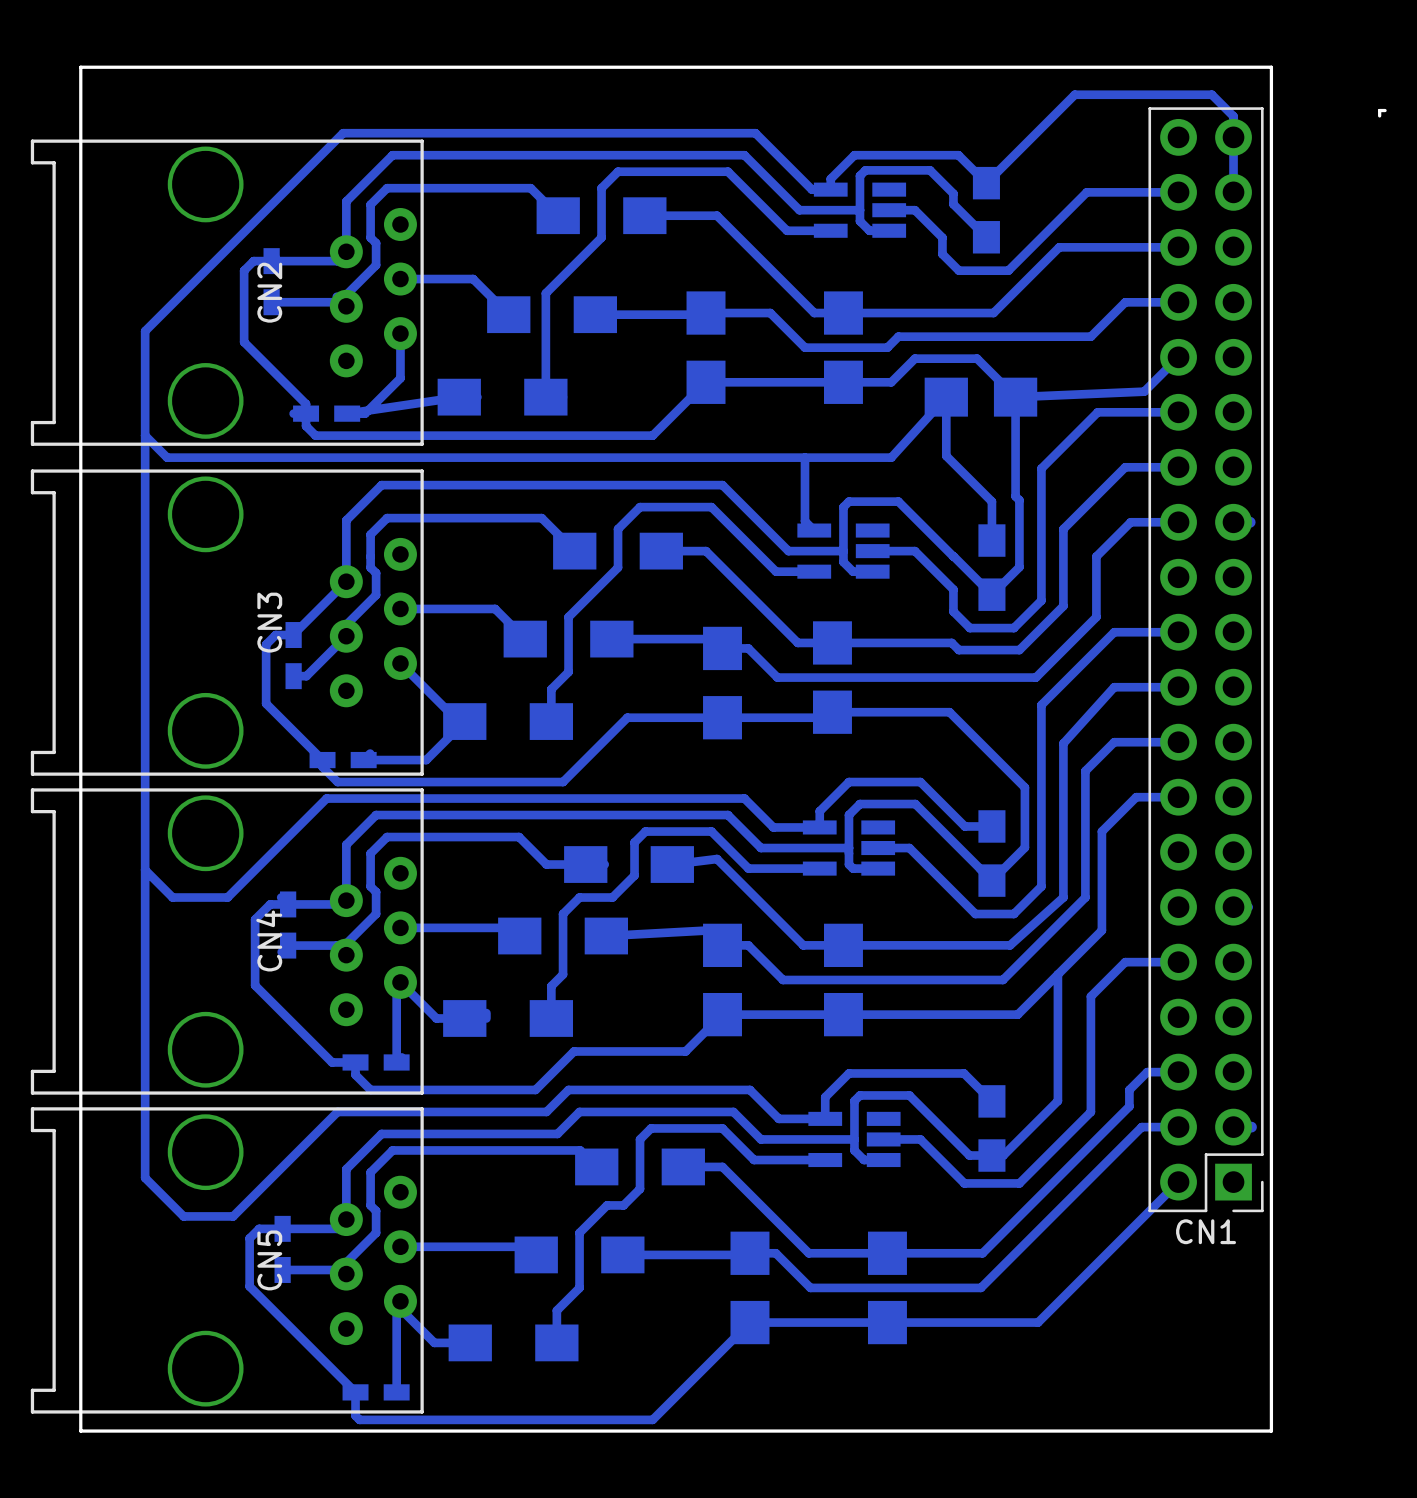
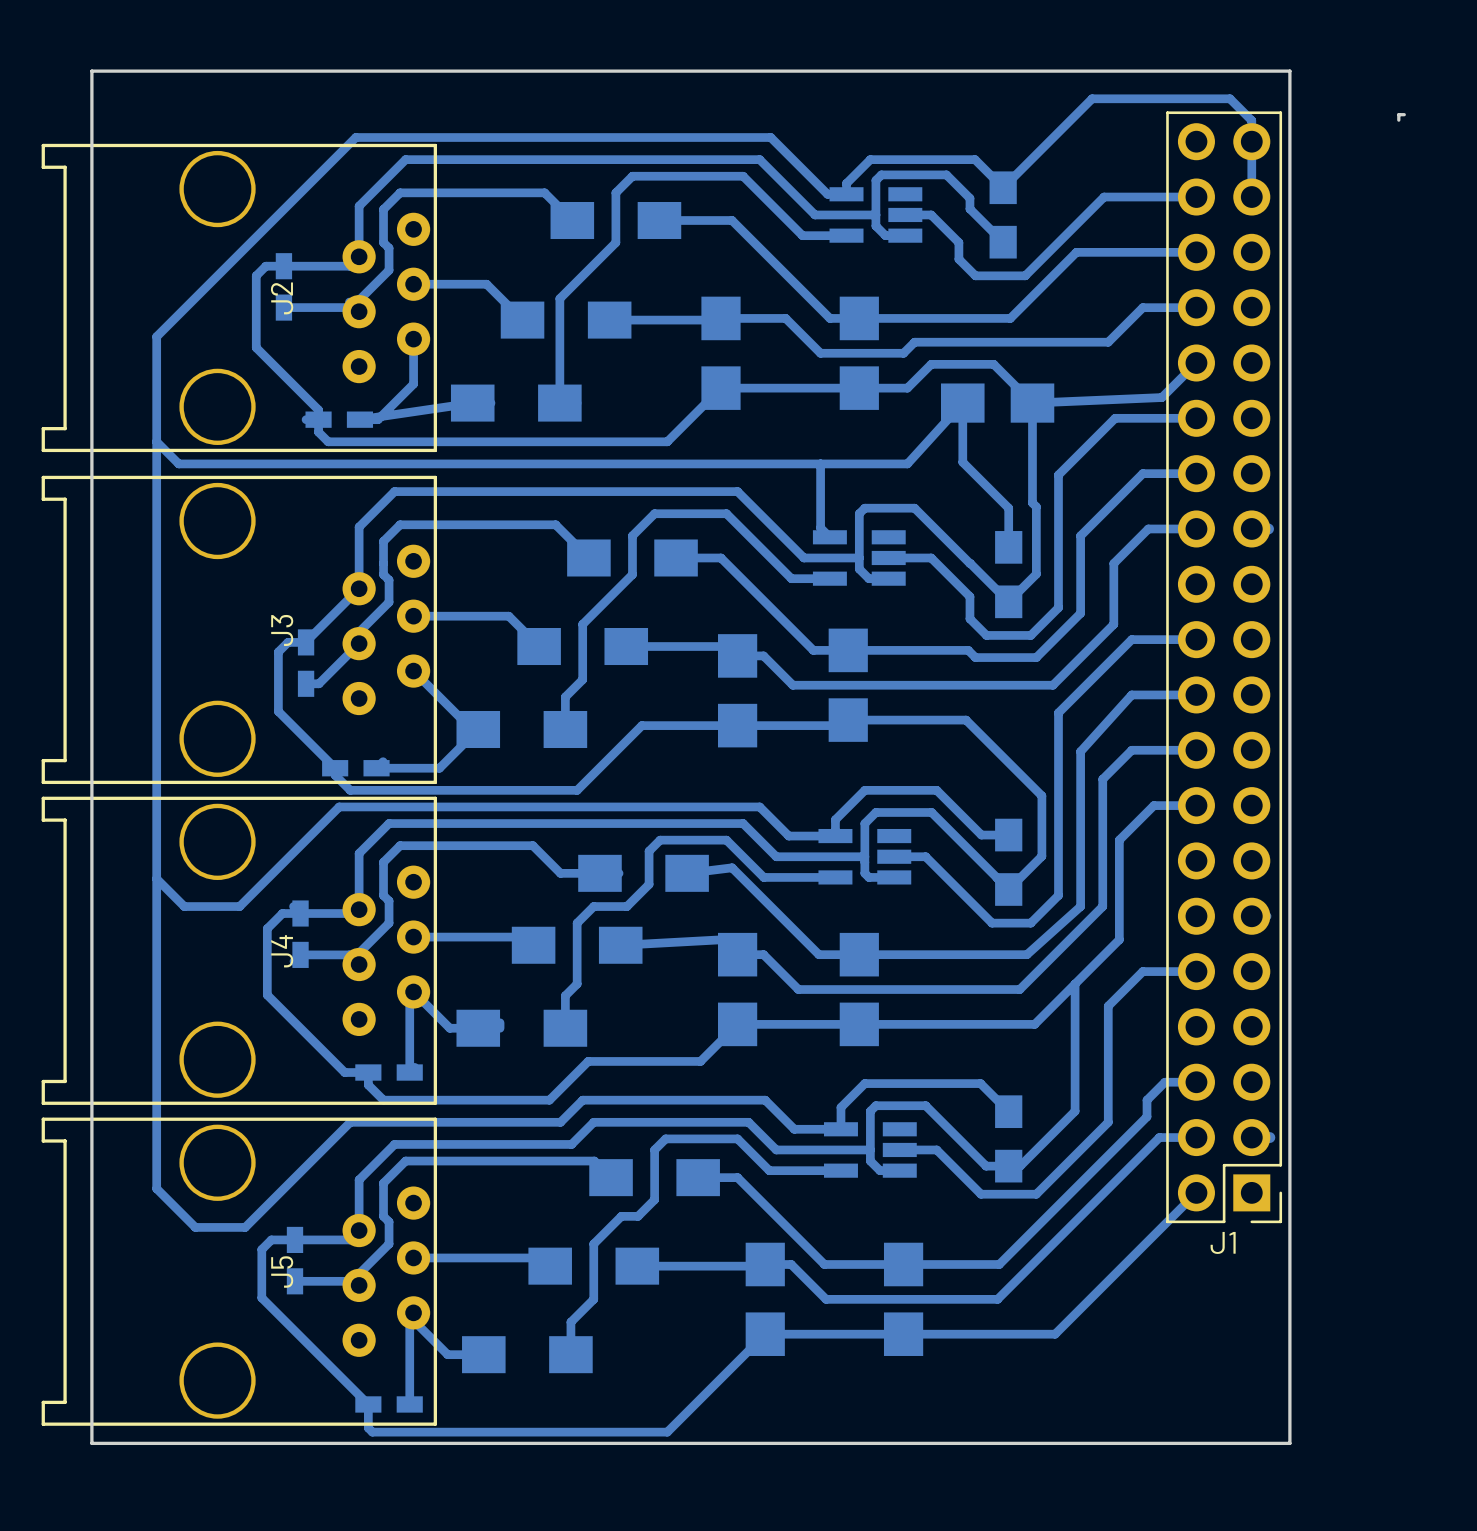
CN2 name: CN2 (269, 292) -> J2 (282, 298)
CN3 name: CN3 (269, 622) -> J3 (282, 630)
CN4 name: CN4 (269, 940) -> J4 (282, 951)
CN1 name: CN1 (1206, 1231) -> J1 (1223, 1242)
CN5 name: CN5 (269, 1260) -> J5 (282, 1272)

